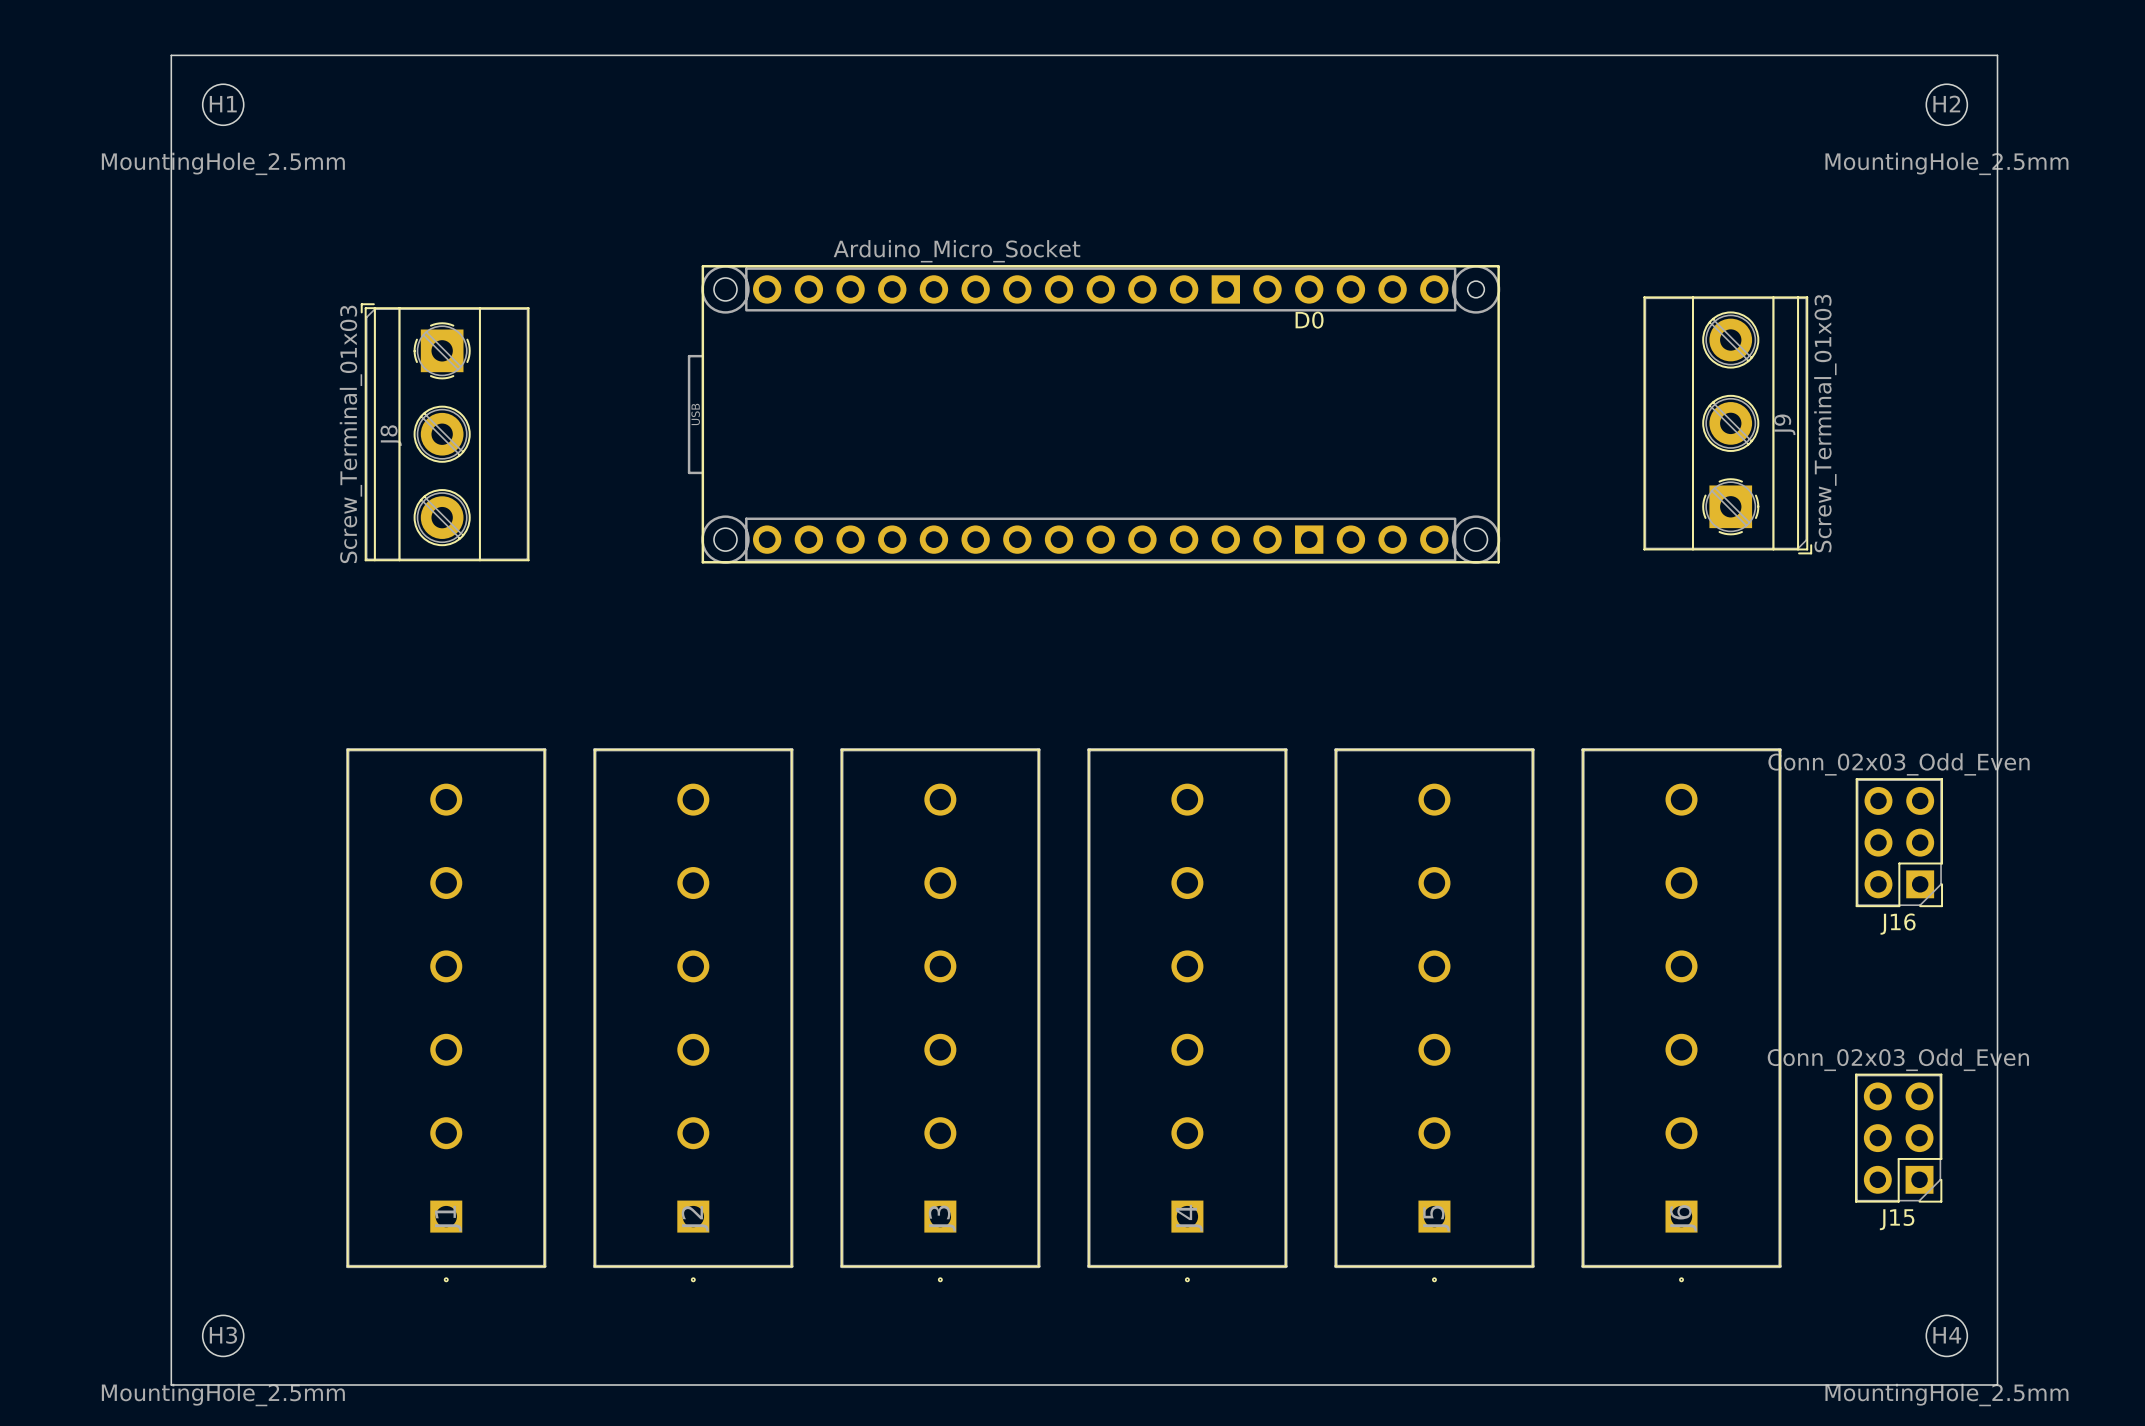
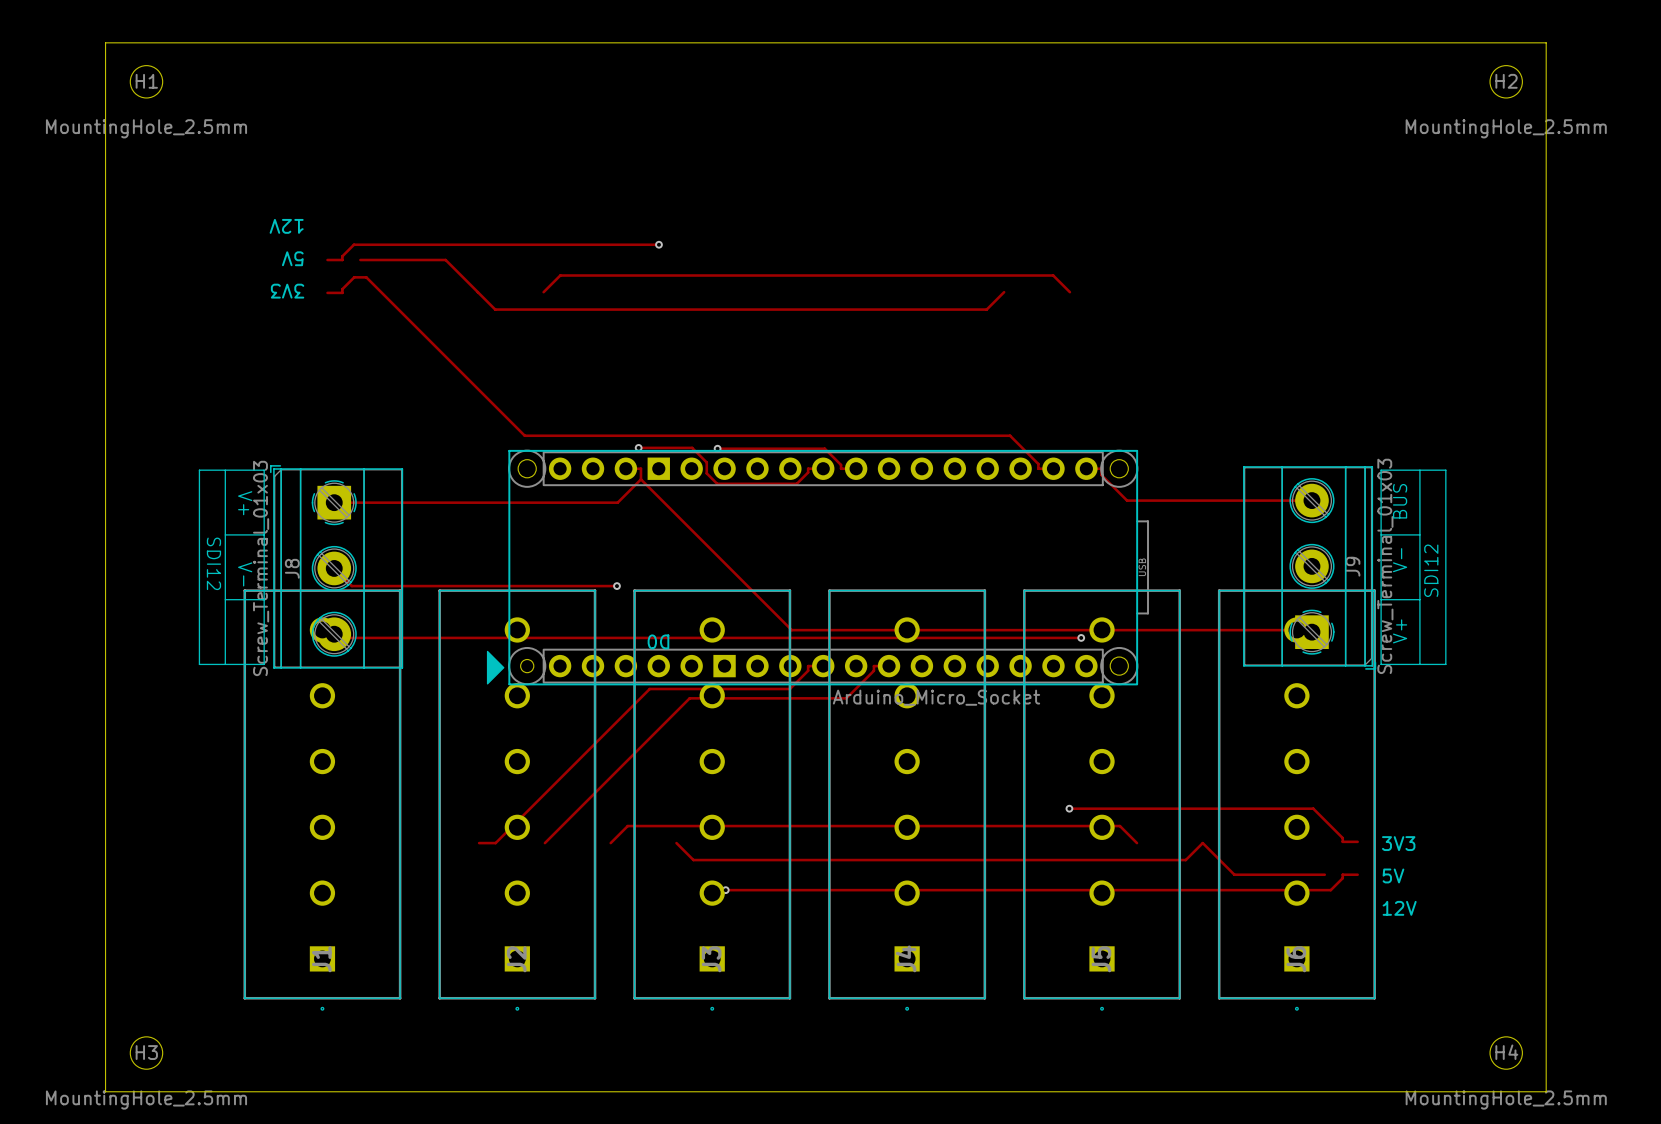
text: none -> 12V (286, 226)
track: none -> (658, 244) (353, 244) (342, 256) (342, 260) (327, 260)
via: none -> (658, 244)
text: none -> 5V (292, 258)
track: none -> (360, 260) (445, 260) (495, 309) (986, 309) (1004, 292)
text: none -> 3V3 (287, 291)
track: none -> (543, 292) (560, 275) (1053, 275) (1069, 292)
track: none -> (327, 292) (342, 292) (342, 289) (354, 277) (366, 277) (524, 435) (1010, 435) (1038, 464) (1038, 468) (1053, 468)
part rotation: 0° (1094, 414) -> 180° (828, 567)
J9 position: (1727, 425) -> (1309, 567)
J8 position: (445, 432) -> (336, 566)
track: none -> (638, 447) (692, 447) (706, 462) (706, 473) (717, 483) (796, 483) (808, 472) (808, 468) (823, 468)
via: none -> (638, 447)
track: none -> (717, 448) (824, 448) (841, 464) (841, 468) (856, 468)
via: none -> (717, 448)
track: none -> (625, 468) (640, 468) (640, 479)
track: none -> (1086, 468) (1101, 468) (1101, 474) (1127, 500) (1311, 500)
line: none -> (199, 470) (264, 470) (264, 664) (199, 664) (199, 470)
line: none -> (225, 470) (225, 664)
line: none -> (1381, 470) (1445, 470) (1445, 664) (1381, 664) (1381, 470)
line: none -> (1419, 470) (1419, 664)
track: none -> (640, 479) (791, 630) (1289, 630) (1291, 632) (1311, 632)
track: none -> (640, 479) (617, 502) (334, 502)
text: none -> V+ (245, 503)
text: none -> BUS (1400, 501)
line: none -> (225, 534) (264, 534)
line: none -> (1381, 534) (1419, 534)
text: none -> SDI12 (213, 563)
text: none -> V- (1400, 560)
track: none -> (334, 568) (351, 586) (616, 586)
text: none -> V- (245, 574)
text: none -> SDI12 (1431, 570)
via: none -> (616, 586)
line: none -> (225, 599) (264, 599)
line: none -> (1381, 599) (1419, 599)
text: none -> V+ (1400, 631)
track: none -> (334, 634) (337, 637) (1081, 637)
via: none -> (1081, 637)
drawing: none -> [486, 650, 505, 685]
J16: Conn_02x03_Odd_Even (1899, 842) -> none
track: none -> (823, 666) (808, 666) (808, 670) (789, 689) (649, 689) (495, 843) (479, 843)
track: none -> (889, 666) (873, 666) (873, 670) (846, 698) (689, 698) (544, 843)
track: none -> (1069, 808) (1313, 808) (1342, 838) (1342, 841) (1357, 841)
via: none -> (1069, 808)
track: none -> (610, 843) (627, 826) (1119, 826) (1136, 843)
track: none -> (676, 843) (693, 860) (1185, 860) (1202, 843) (1234, 874) (1324, 874)
text: none -> 3V3 (1398, 843)
track: none -> (1357, 874) (1342, 874) (1342, 878) (1330, 890) (725, 890)
text: none -> 5V (1393, 875)
via: none -> (725, 890)
J15: Conn_02x03_Odd_Even (1898, 1138) -> none
text: none -> 12V (1399, 908)

